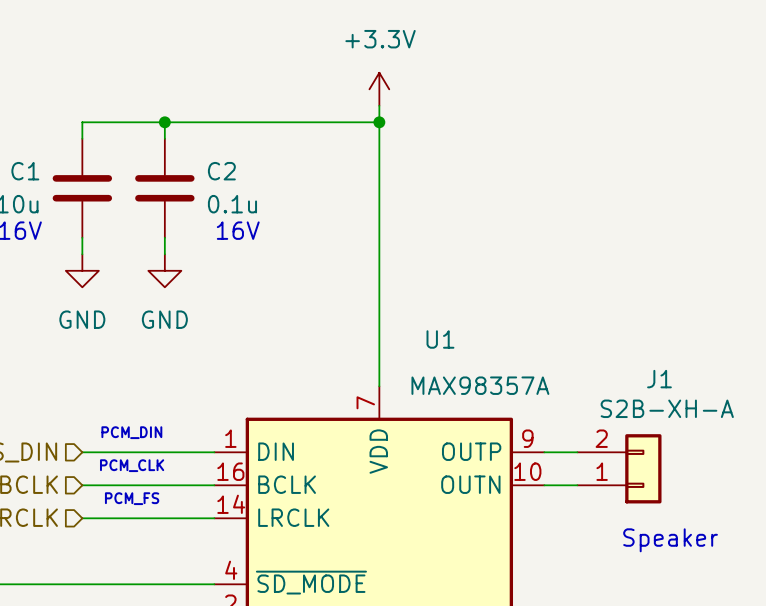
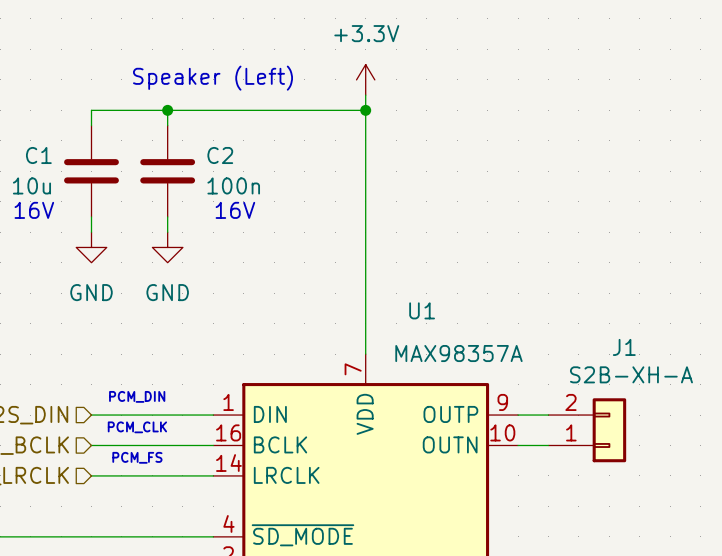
text: none -> Speaker (Left) (212, 78)
C2 value: 0.1u (232, 204) -> 100n (233, 185)
text: Speaker (670, 540) -> none

